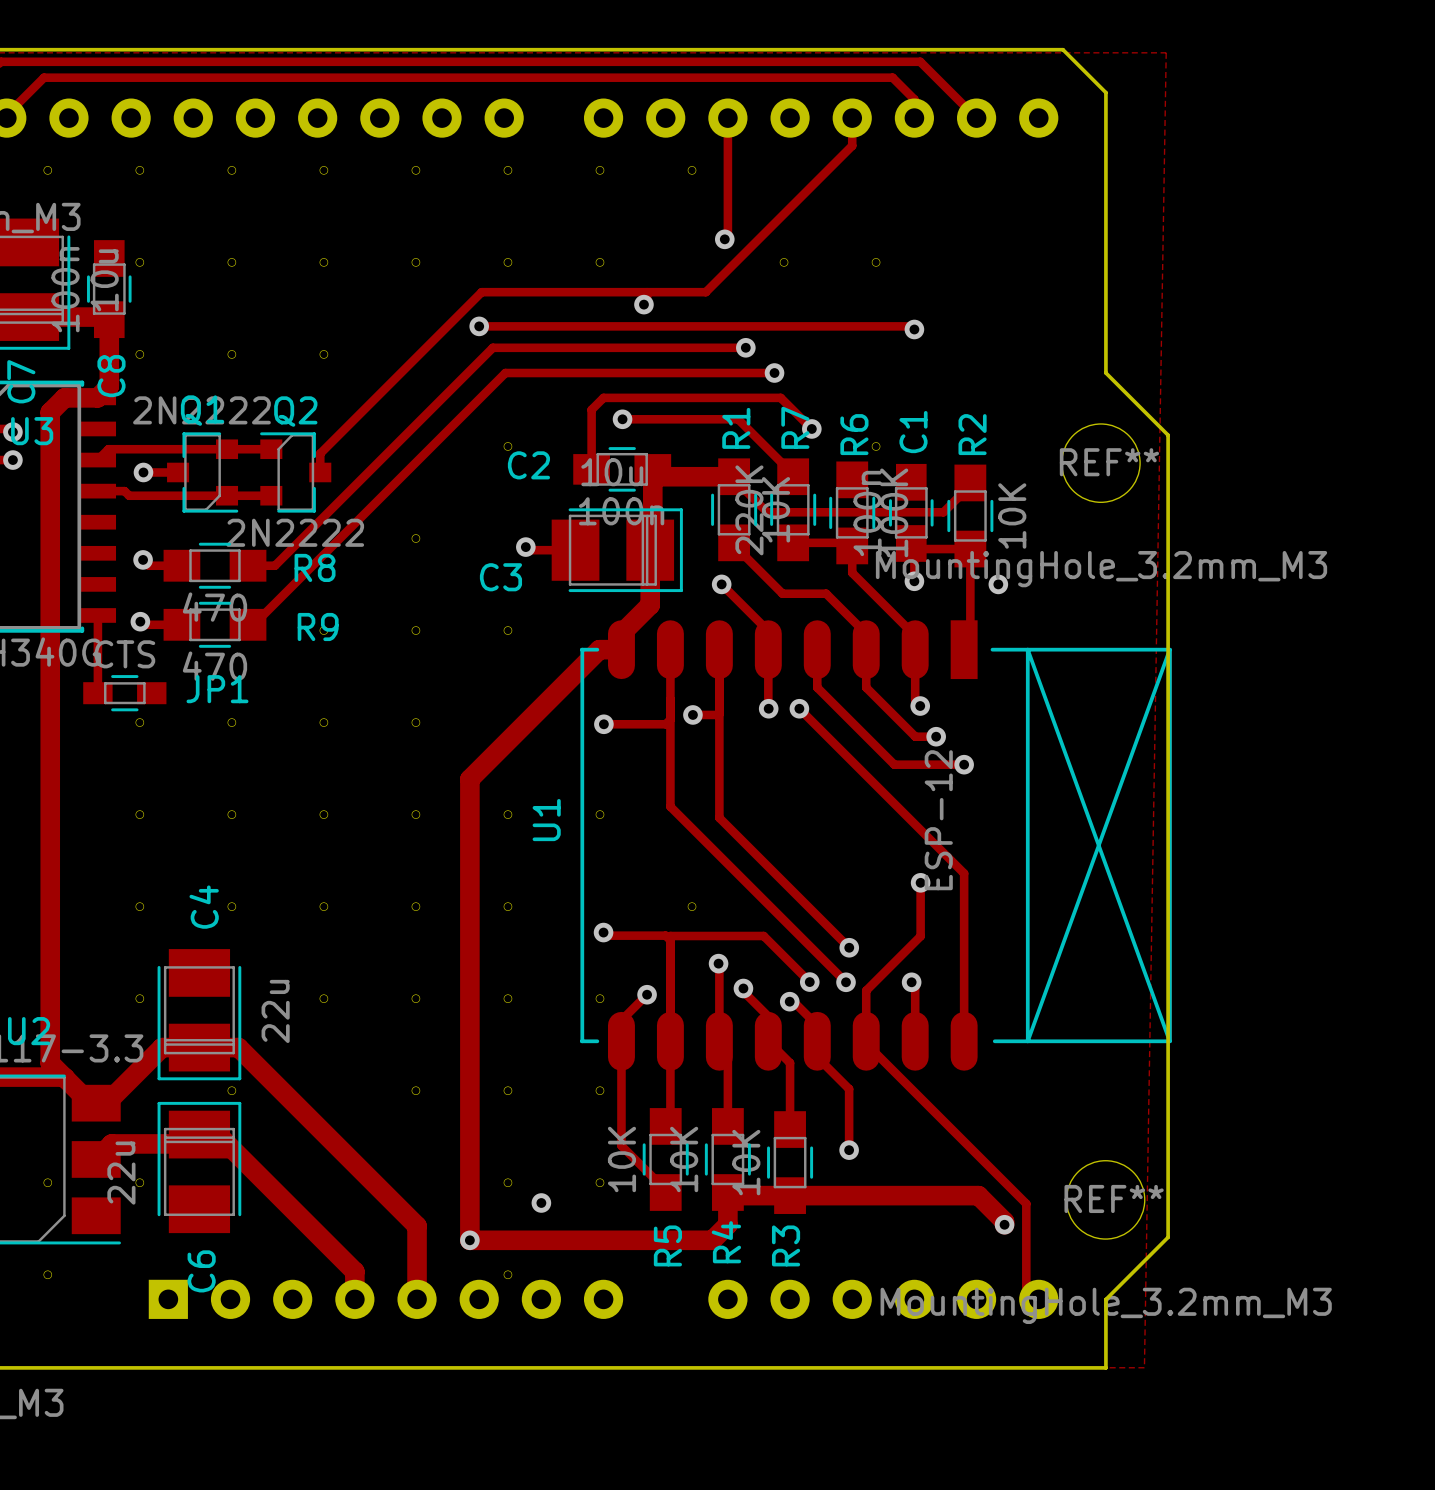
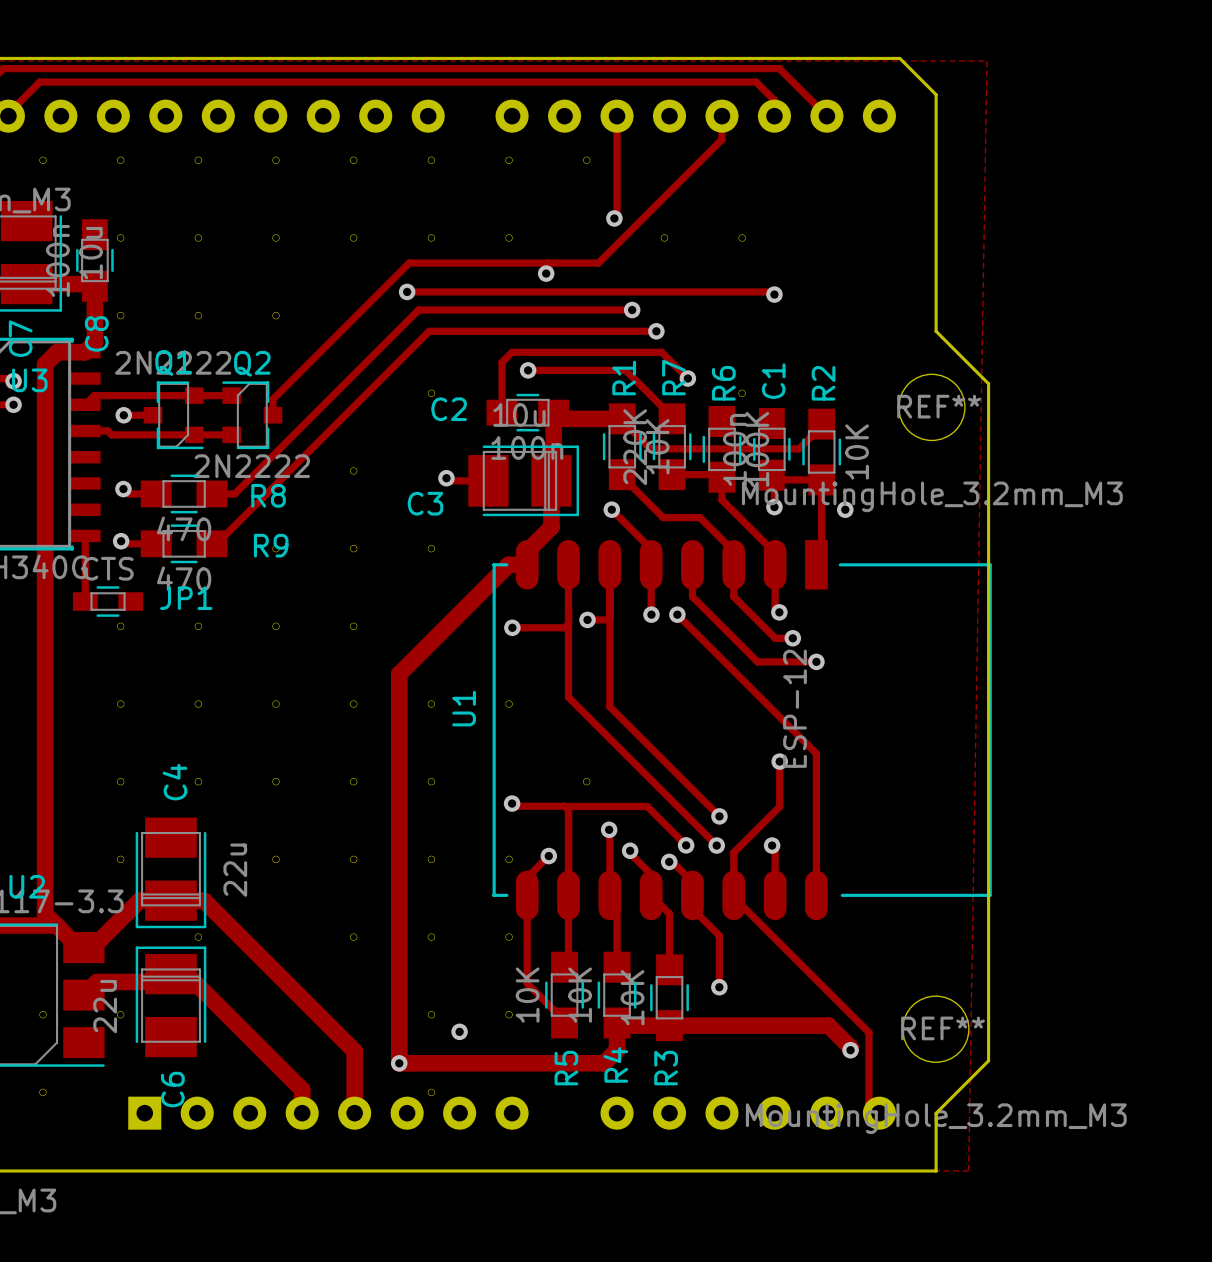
U1 footprint: [579, 620, 1172, 1071] -> [492, 540, 992, 921]

